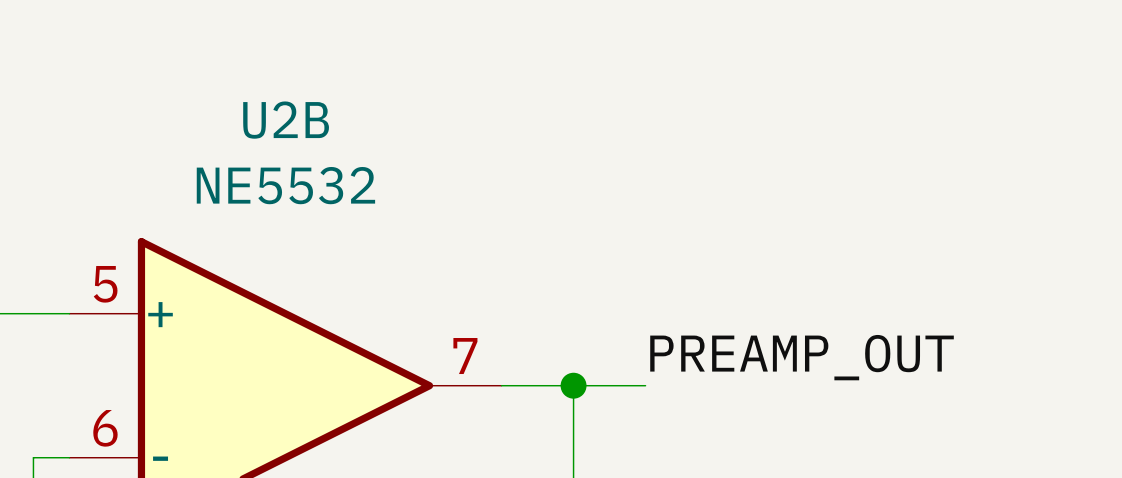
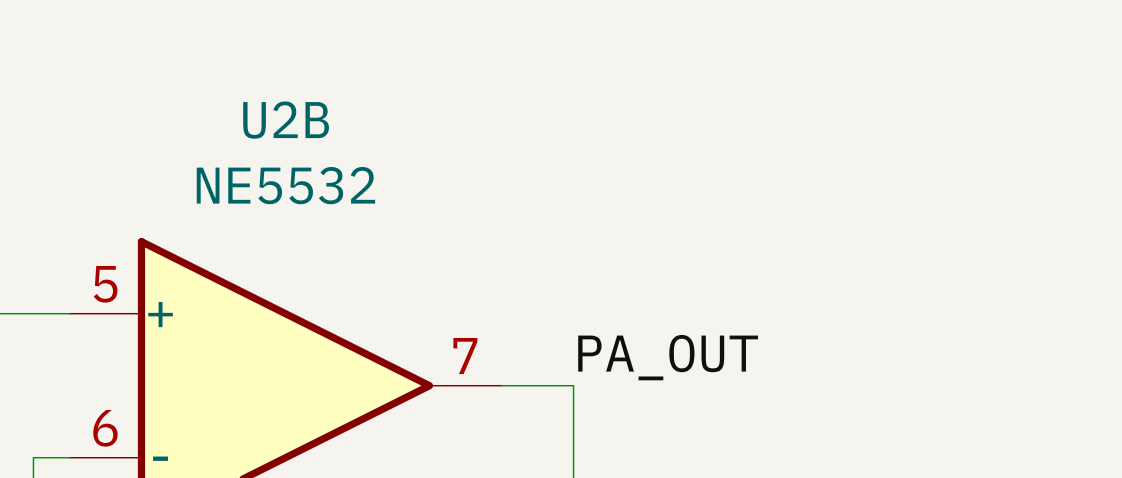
label: PREAMP_OUT (802, 357) -> PA_OUT (668, 357)
wire: (573, 385) (645, 385) -> none
junction: (573, 385) -> none

